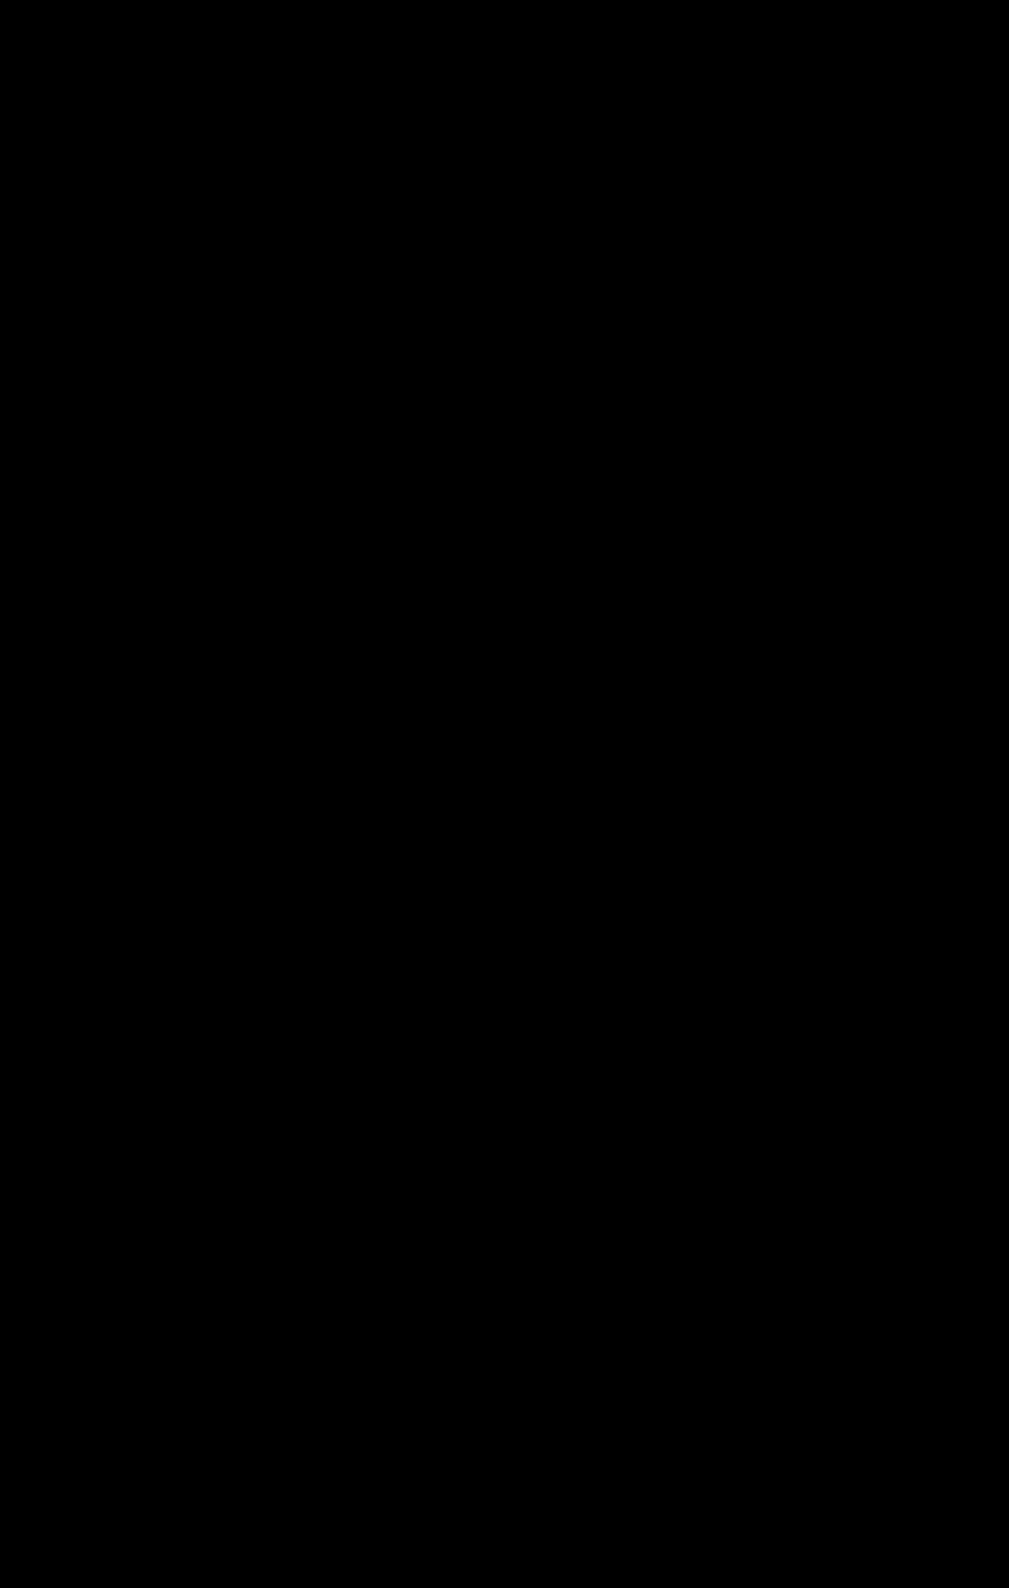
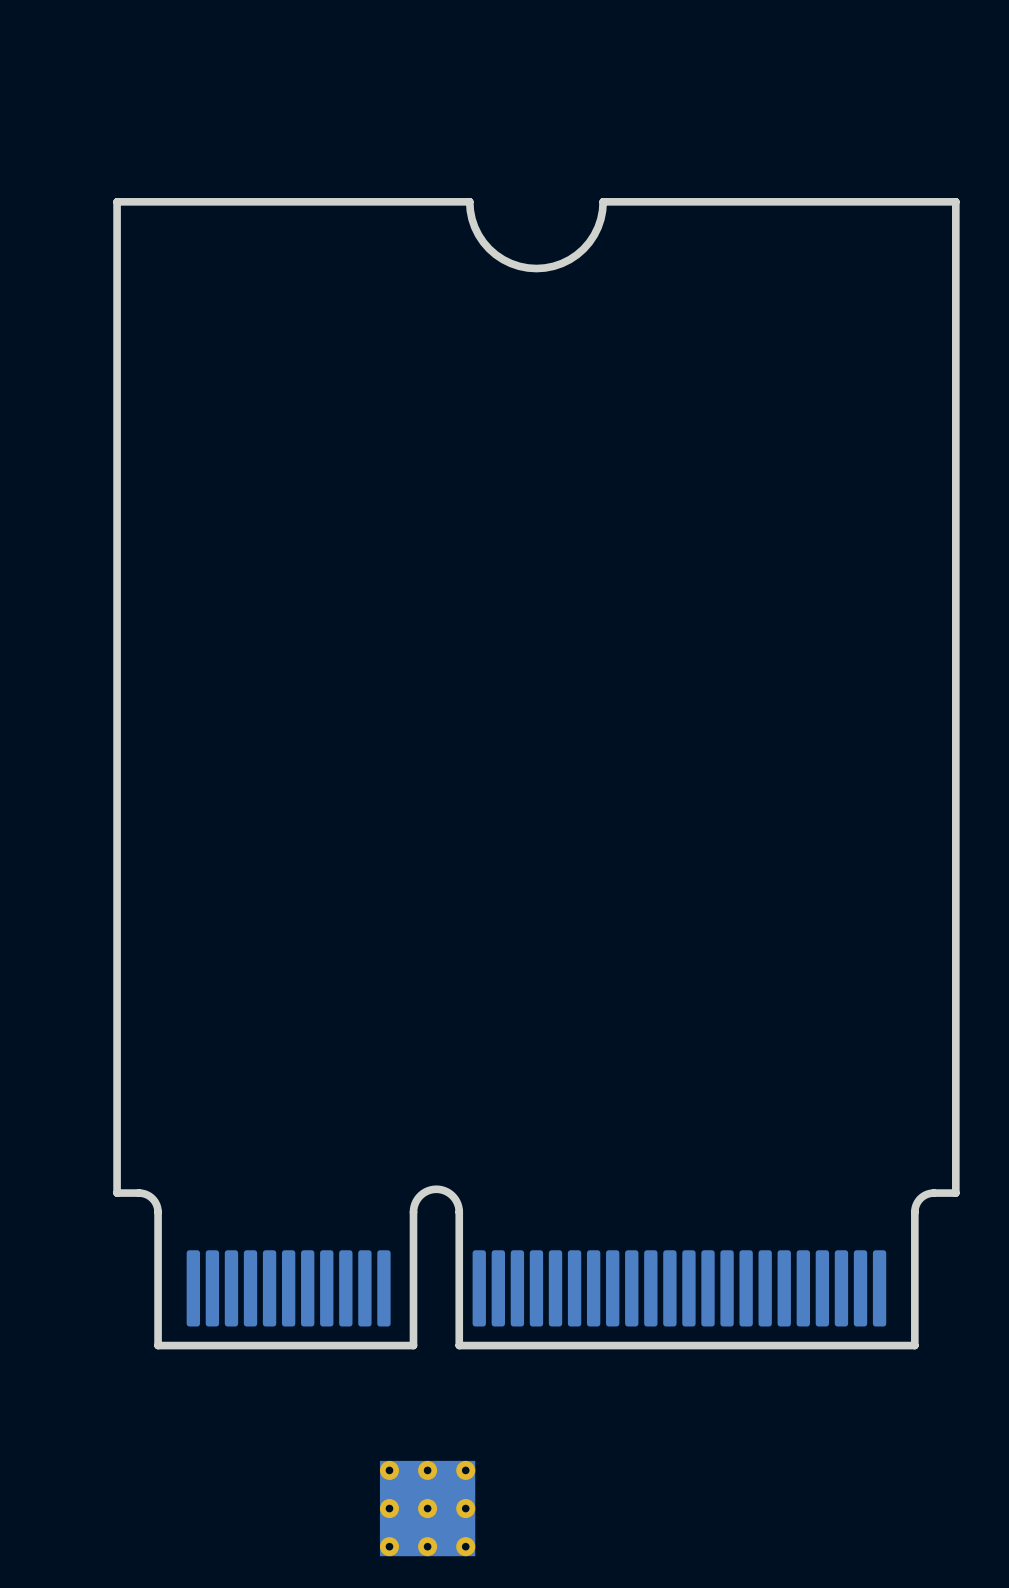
part: none -> (536, 773)
part: none -> (427, 1508)

